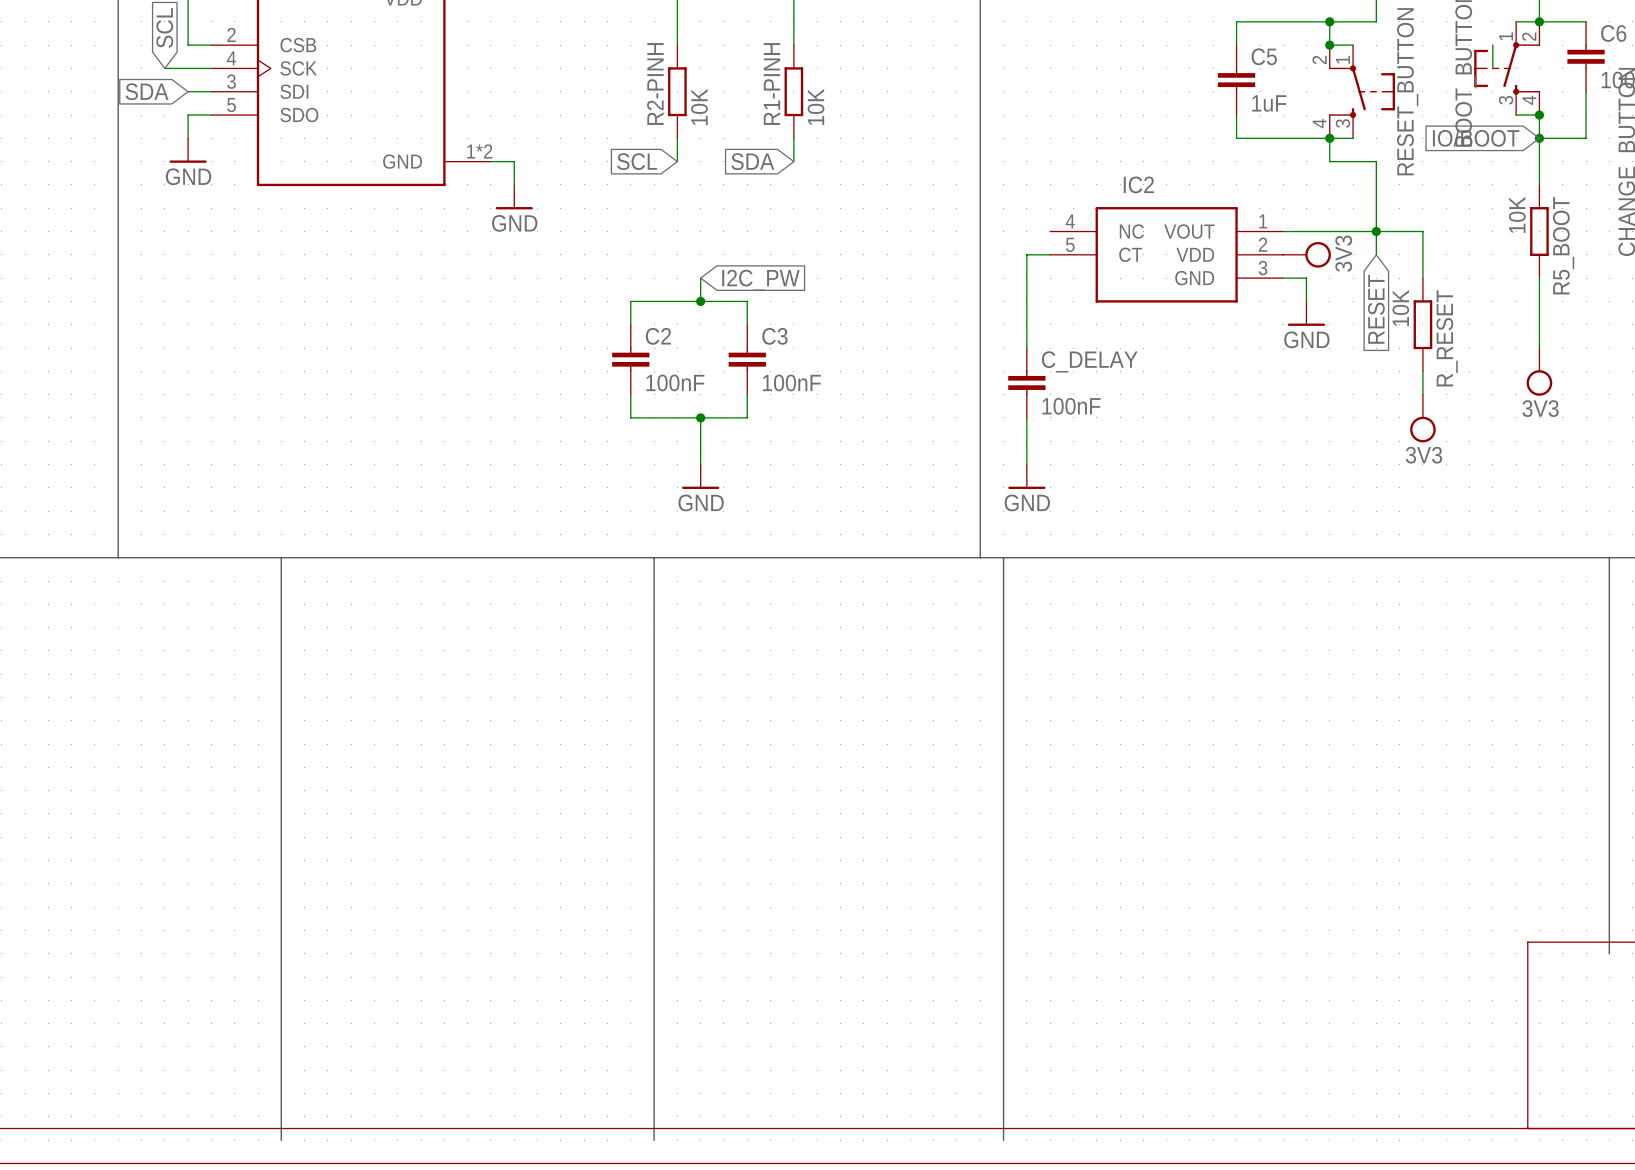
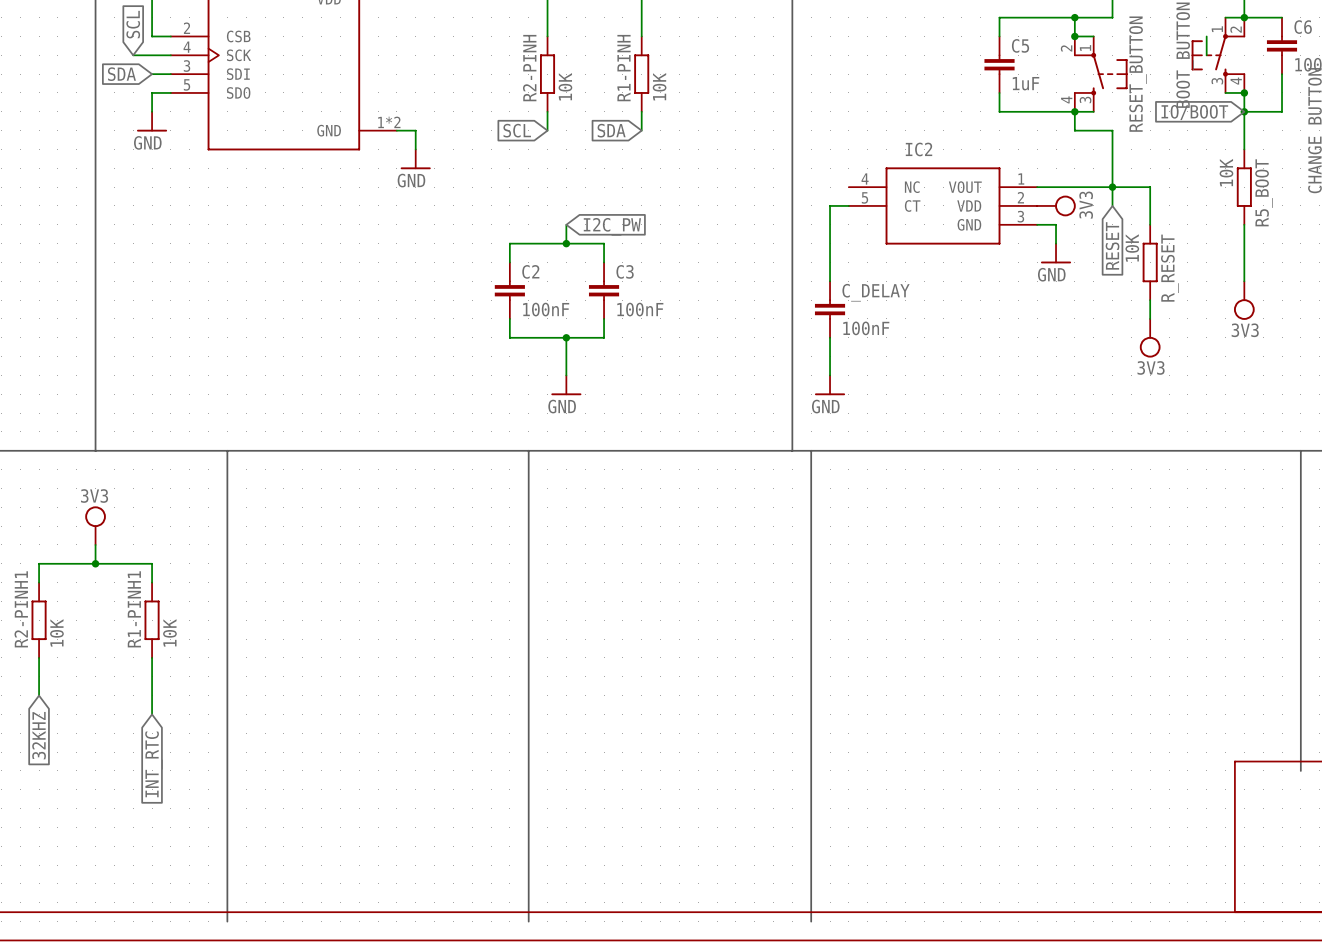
power symbol: none -> 3V3 (95, 525)
wire: none -> (95, 544) (95, 563)
junction: none -> (95, 563)
wire: none -> (39, 582) (39, 563) (152, 563) (152, 582)
R2-PINH1: none -> 10K (39, 620)
R1-PINH1: none -> 10K (152, 620)
wire: none -> (39, 657) (39, 695)
wire: none -> (152, 657) (152, 714)
global label: none -> 32KHZ (39, 735)
global label: none -> INT_RTC (154, 764)

